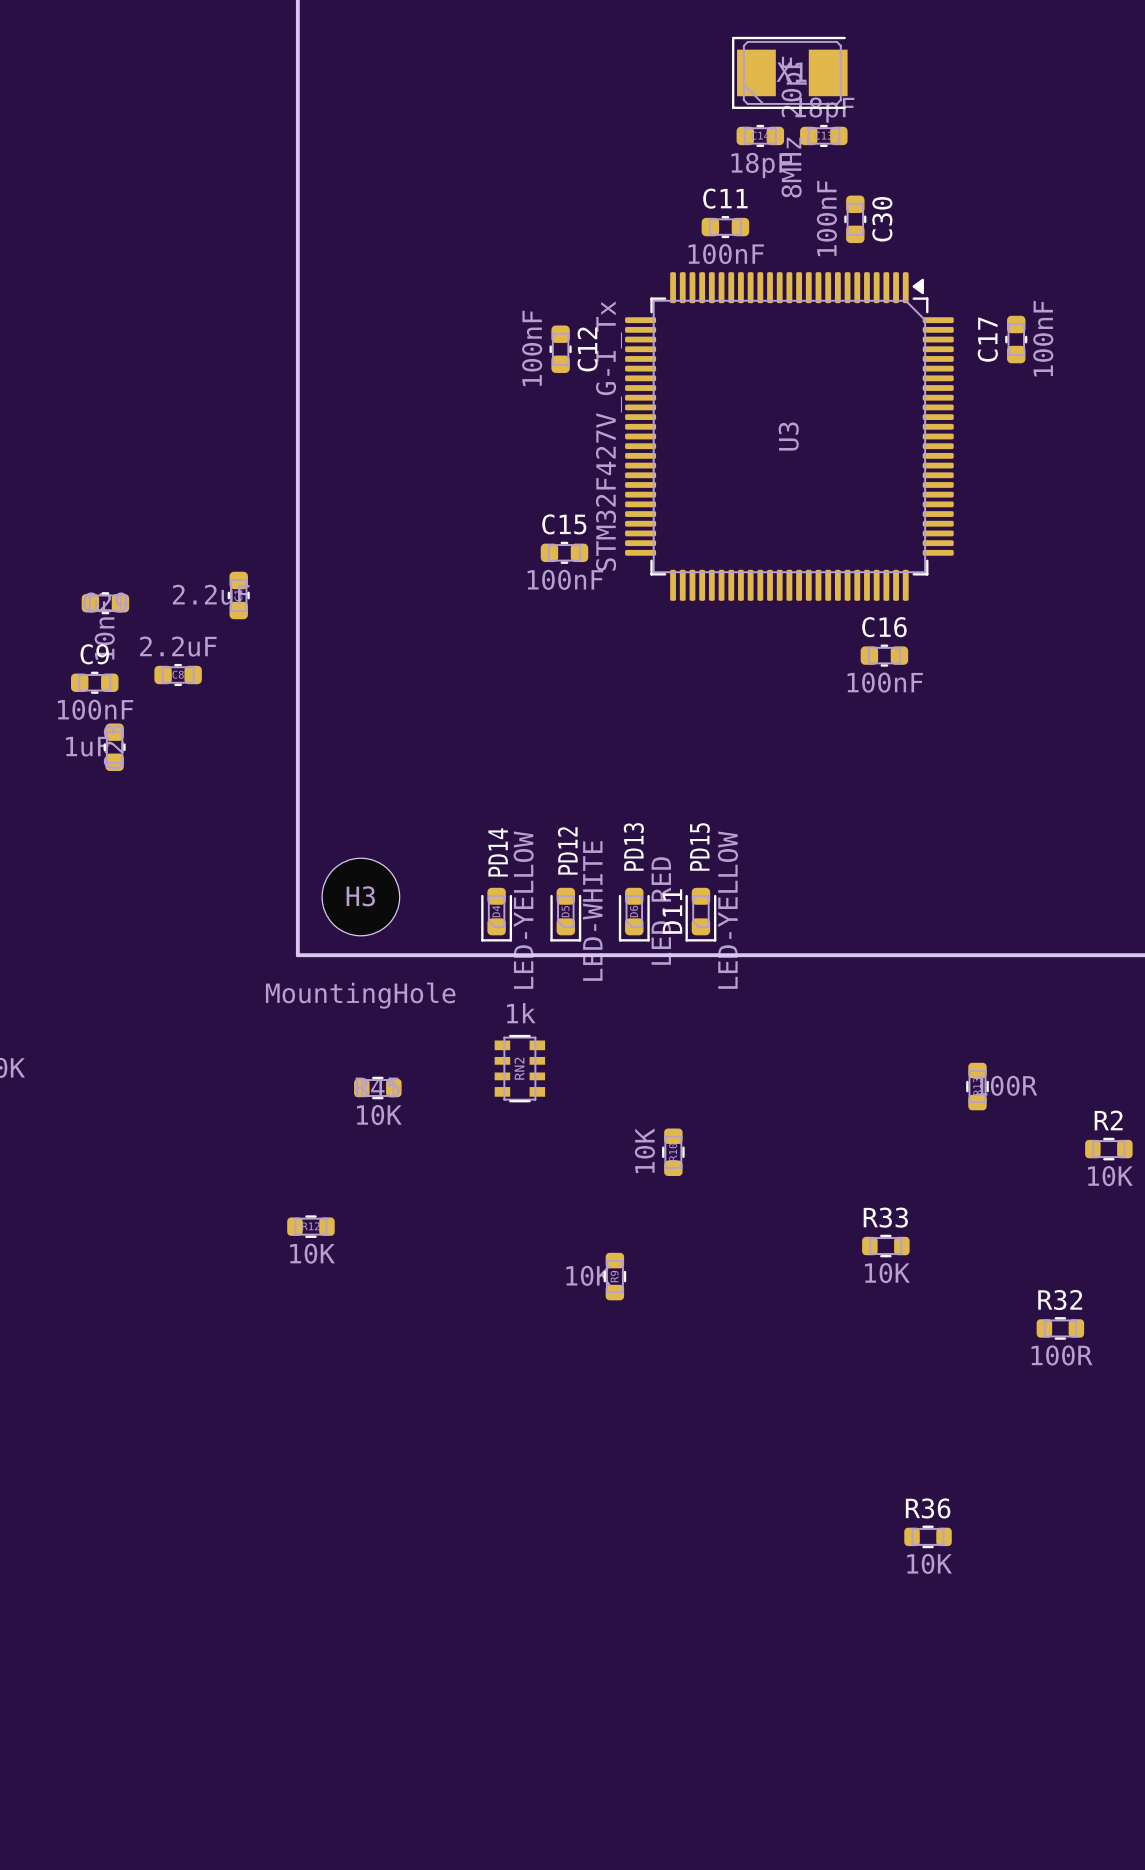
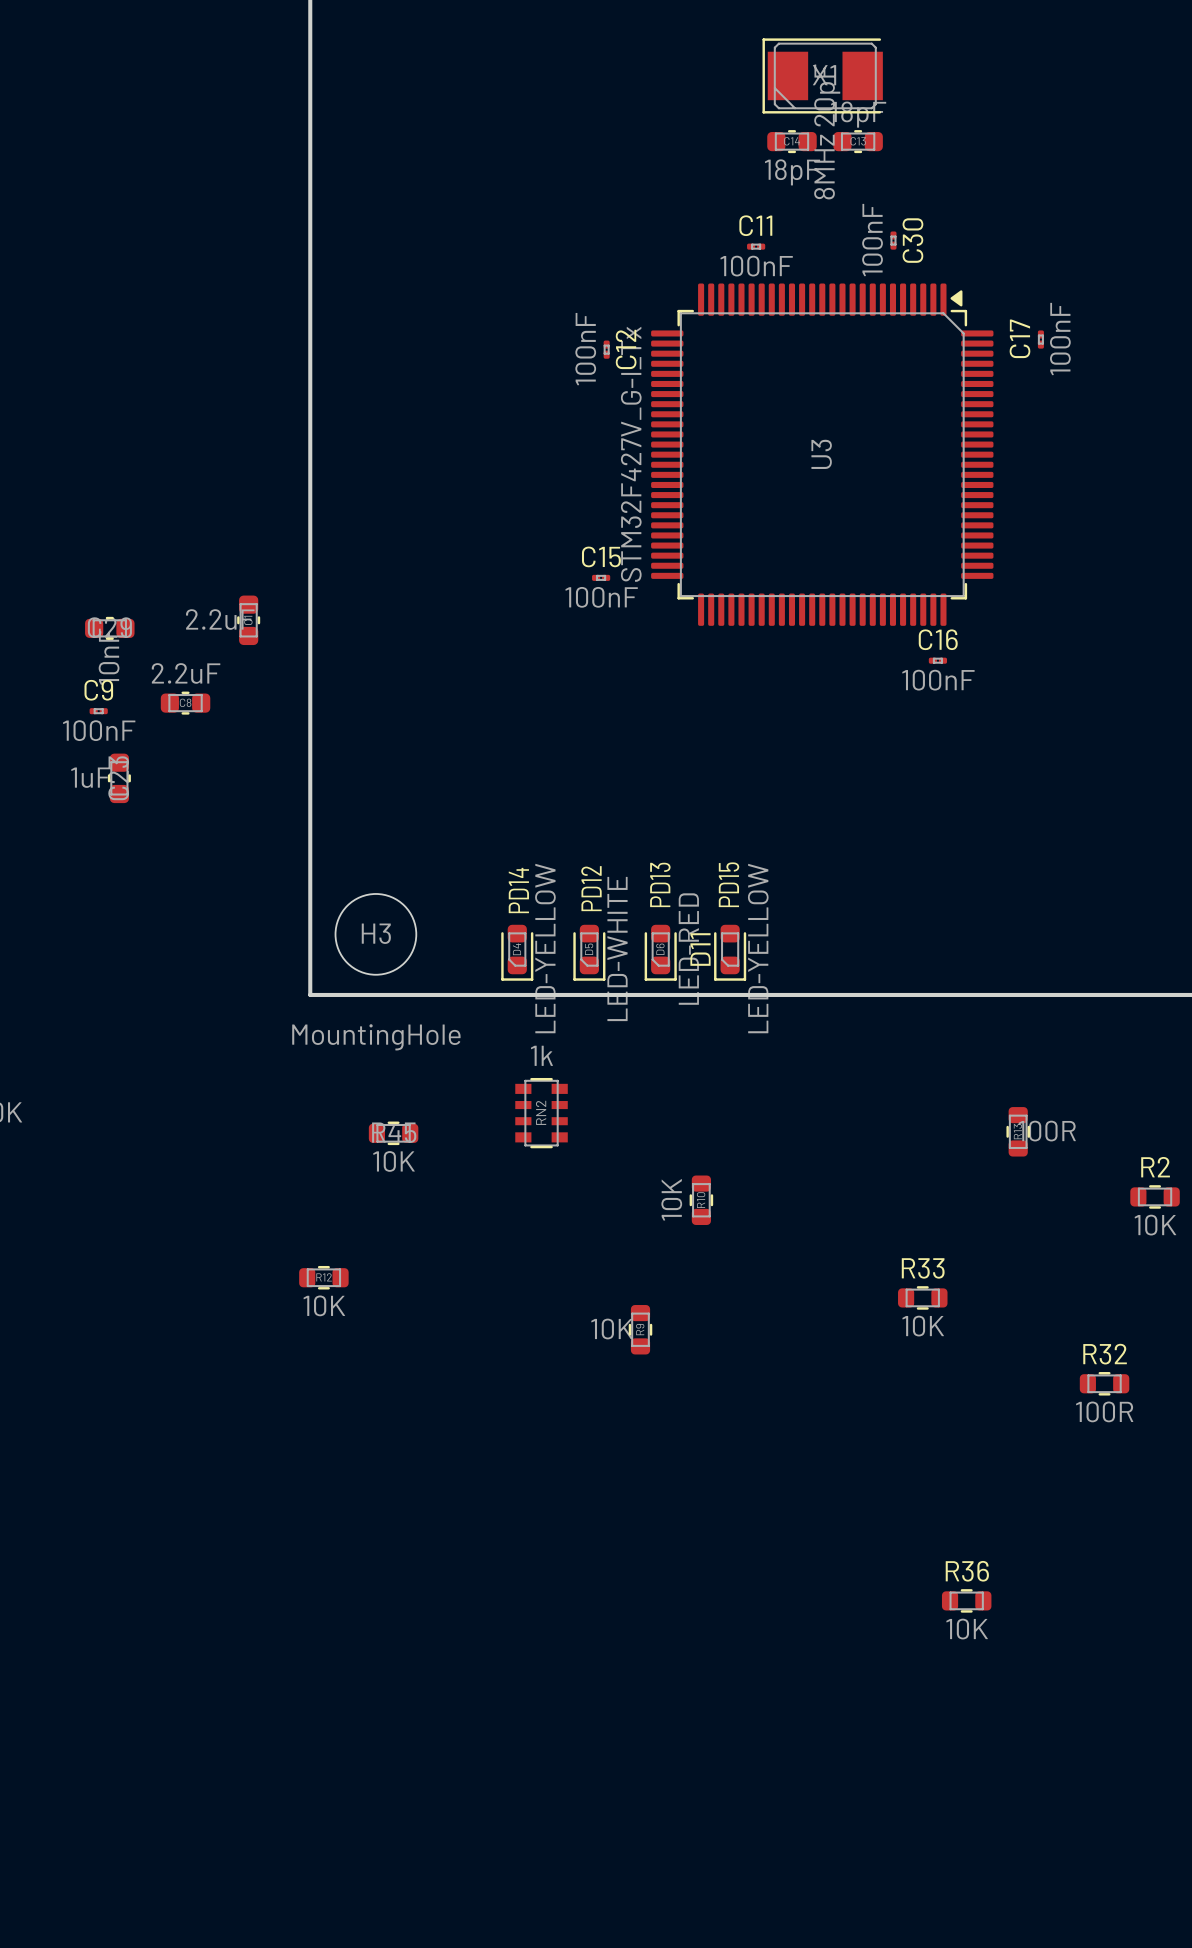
C30 footprint: [844, 195, 867, 244] -> [890, 231, 897, 250]
C11 footprint: [701, 216, 750, 239] -> [747, 243, 766, 250]
C17 footprint: [1005, 315, 1028, 364] -> [1037, 330, 1044, 349]
C12 footprint: [549, 325, 572, 373] -> [603, 340, 610, 359]
C15 footprint: [540, 541, 589, 564] -> [592, 574, 611, 581]
C16 footprint: [860, 644, 909, 667] -> [928, 657, 948, 664]
C9 footprint: [70, 671, 119, 694] -> [89, 708, 108, 715]

